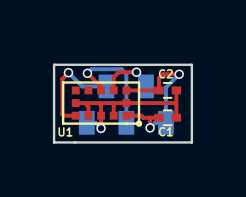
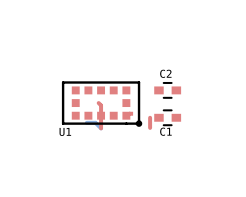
board edge: (54, 64) (54, 142) (191, 142) (191, 64) (54, 64) -> none
bottom track: (68, 72) (82, 86) (106, 86) -> none
top track: (68, 72) (62, 78) (62, 114) (75, 115) -> none
via: (68, 72) -> none
top track: (136, 72) (118, 72) (113, 77) (113, 90) -> none
via: (136, 72) -> none
bottom track: (87, 73) (91, 69) (121, 69) (126, 73) (126, 122) -> none
top track: (87, 73) (101, 86) (101, 90) -> none
via: (87, 73) -> none
bottom track: (179, 74) (165, 87) (165, 122) (155, 122) (150, 127) -> none
top track: (179, 74) (163, 74) (158, 78) (158, 90) (126, 90) -> none
via: (179, 74) -> none
part: (126, 86) -> none
top track: (176, 90) (176, 117) -> none
top track: (75, 103) (176, 104) -> none
top track: (84, 103) (88, 106) (88, 115) -> none
top track: (111, 103) (113, 115) -> none
top track: (126, 115) (158, 117) -> none
part: (126, 122) -> none
via: (150, 127) -> none
via: (101, 128) -> none

